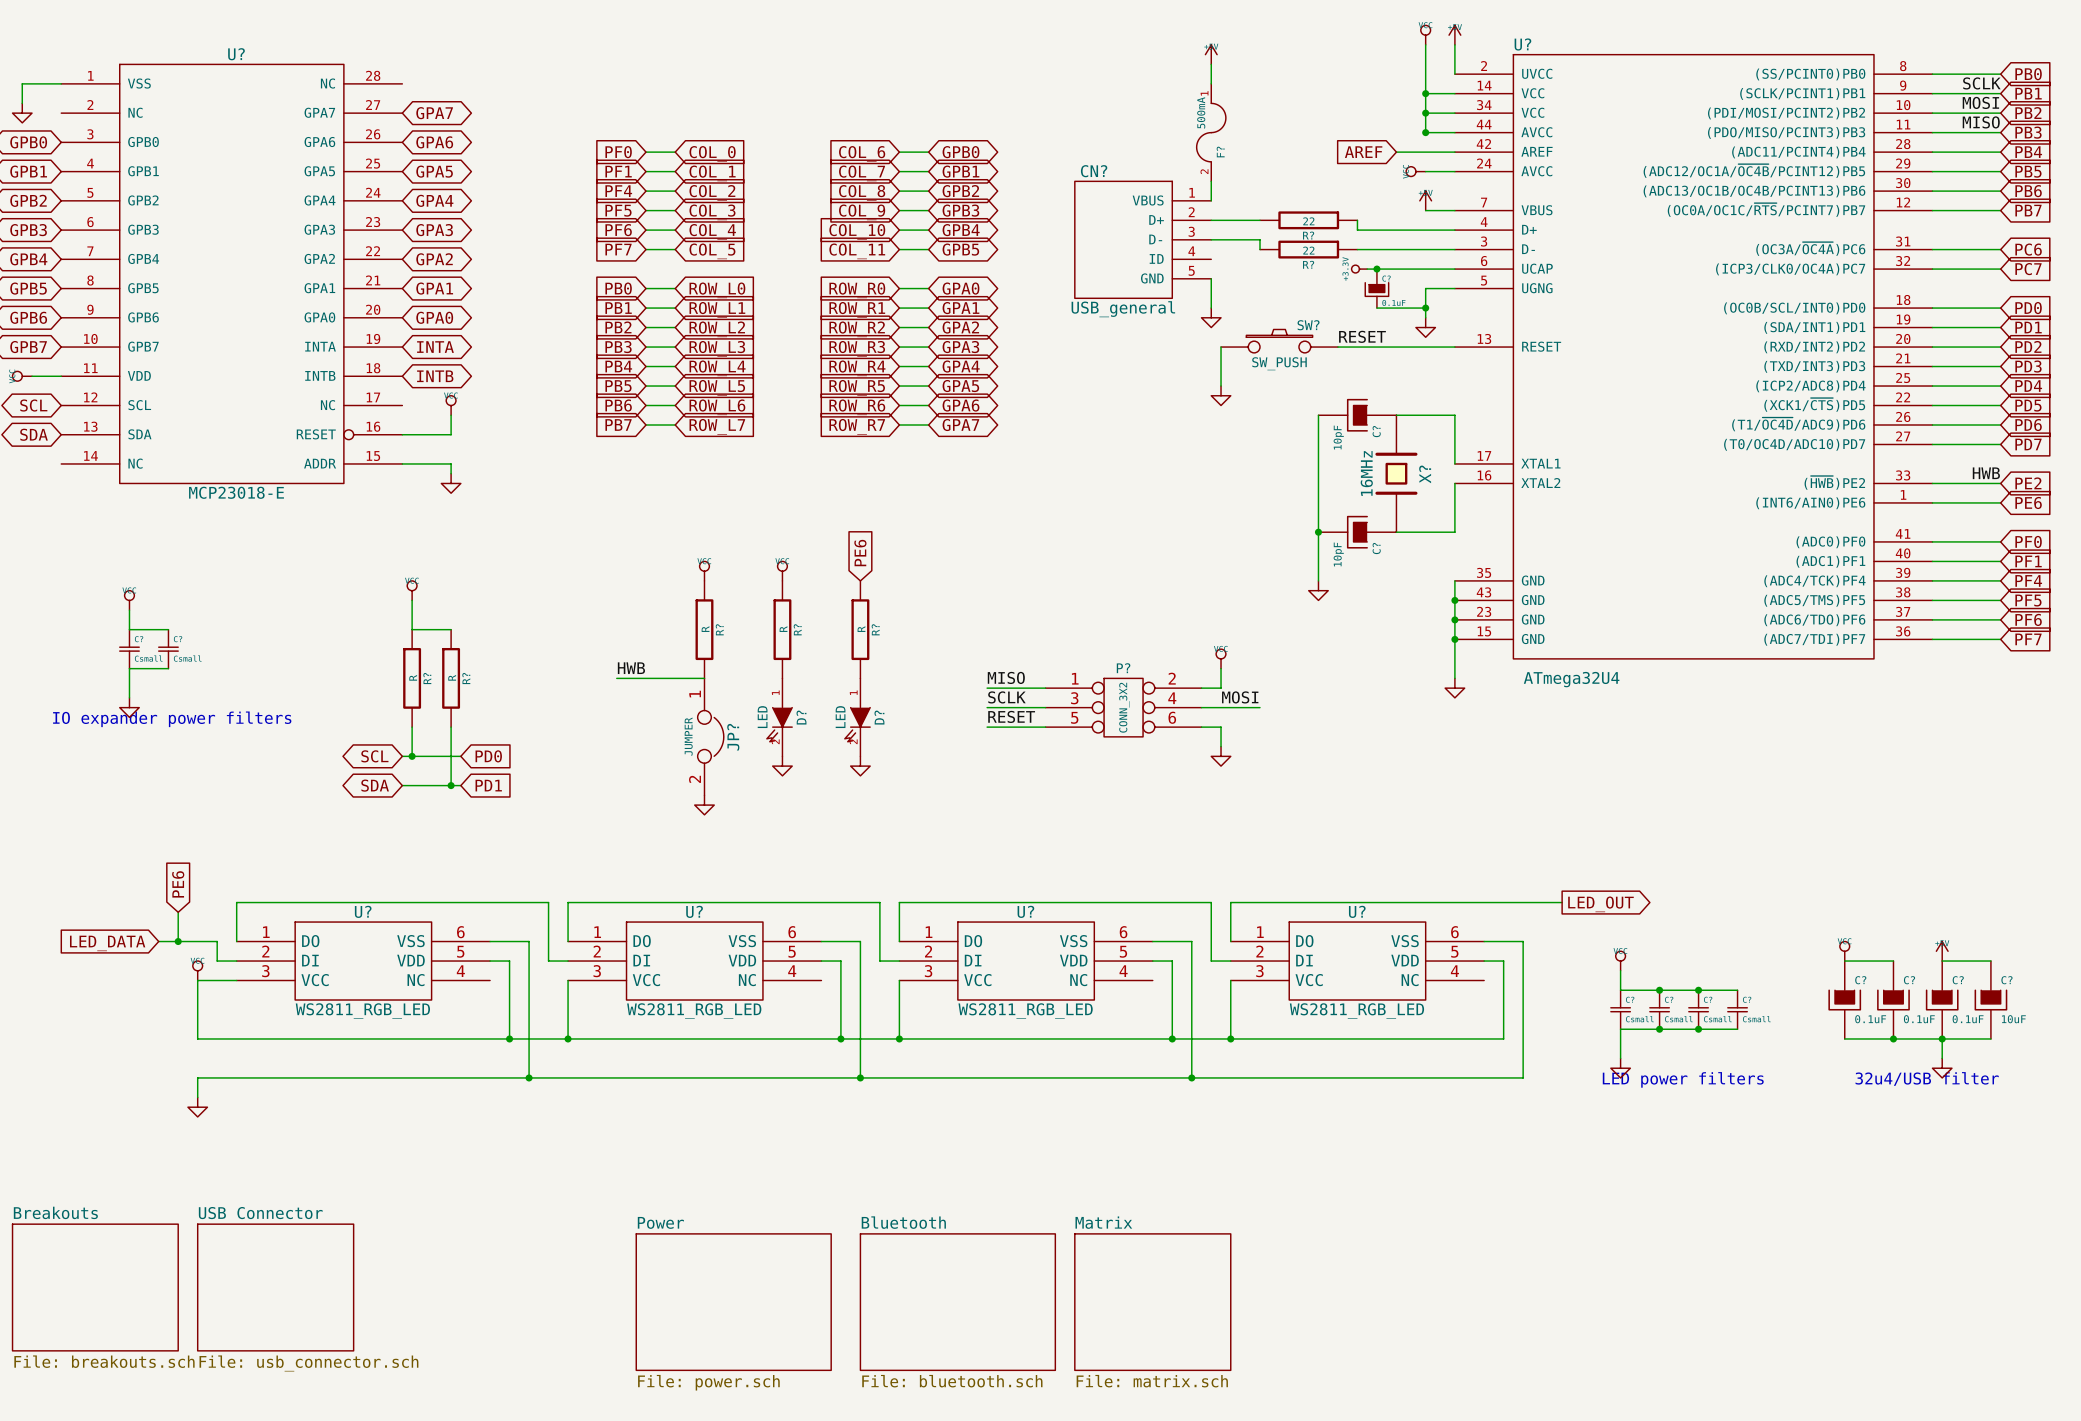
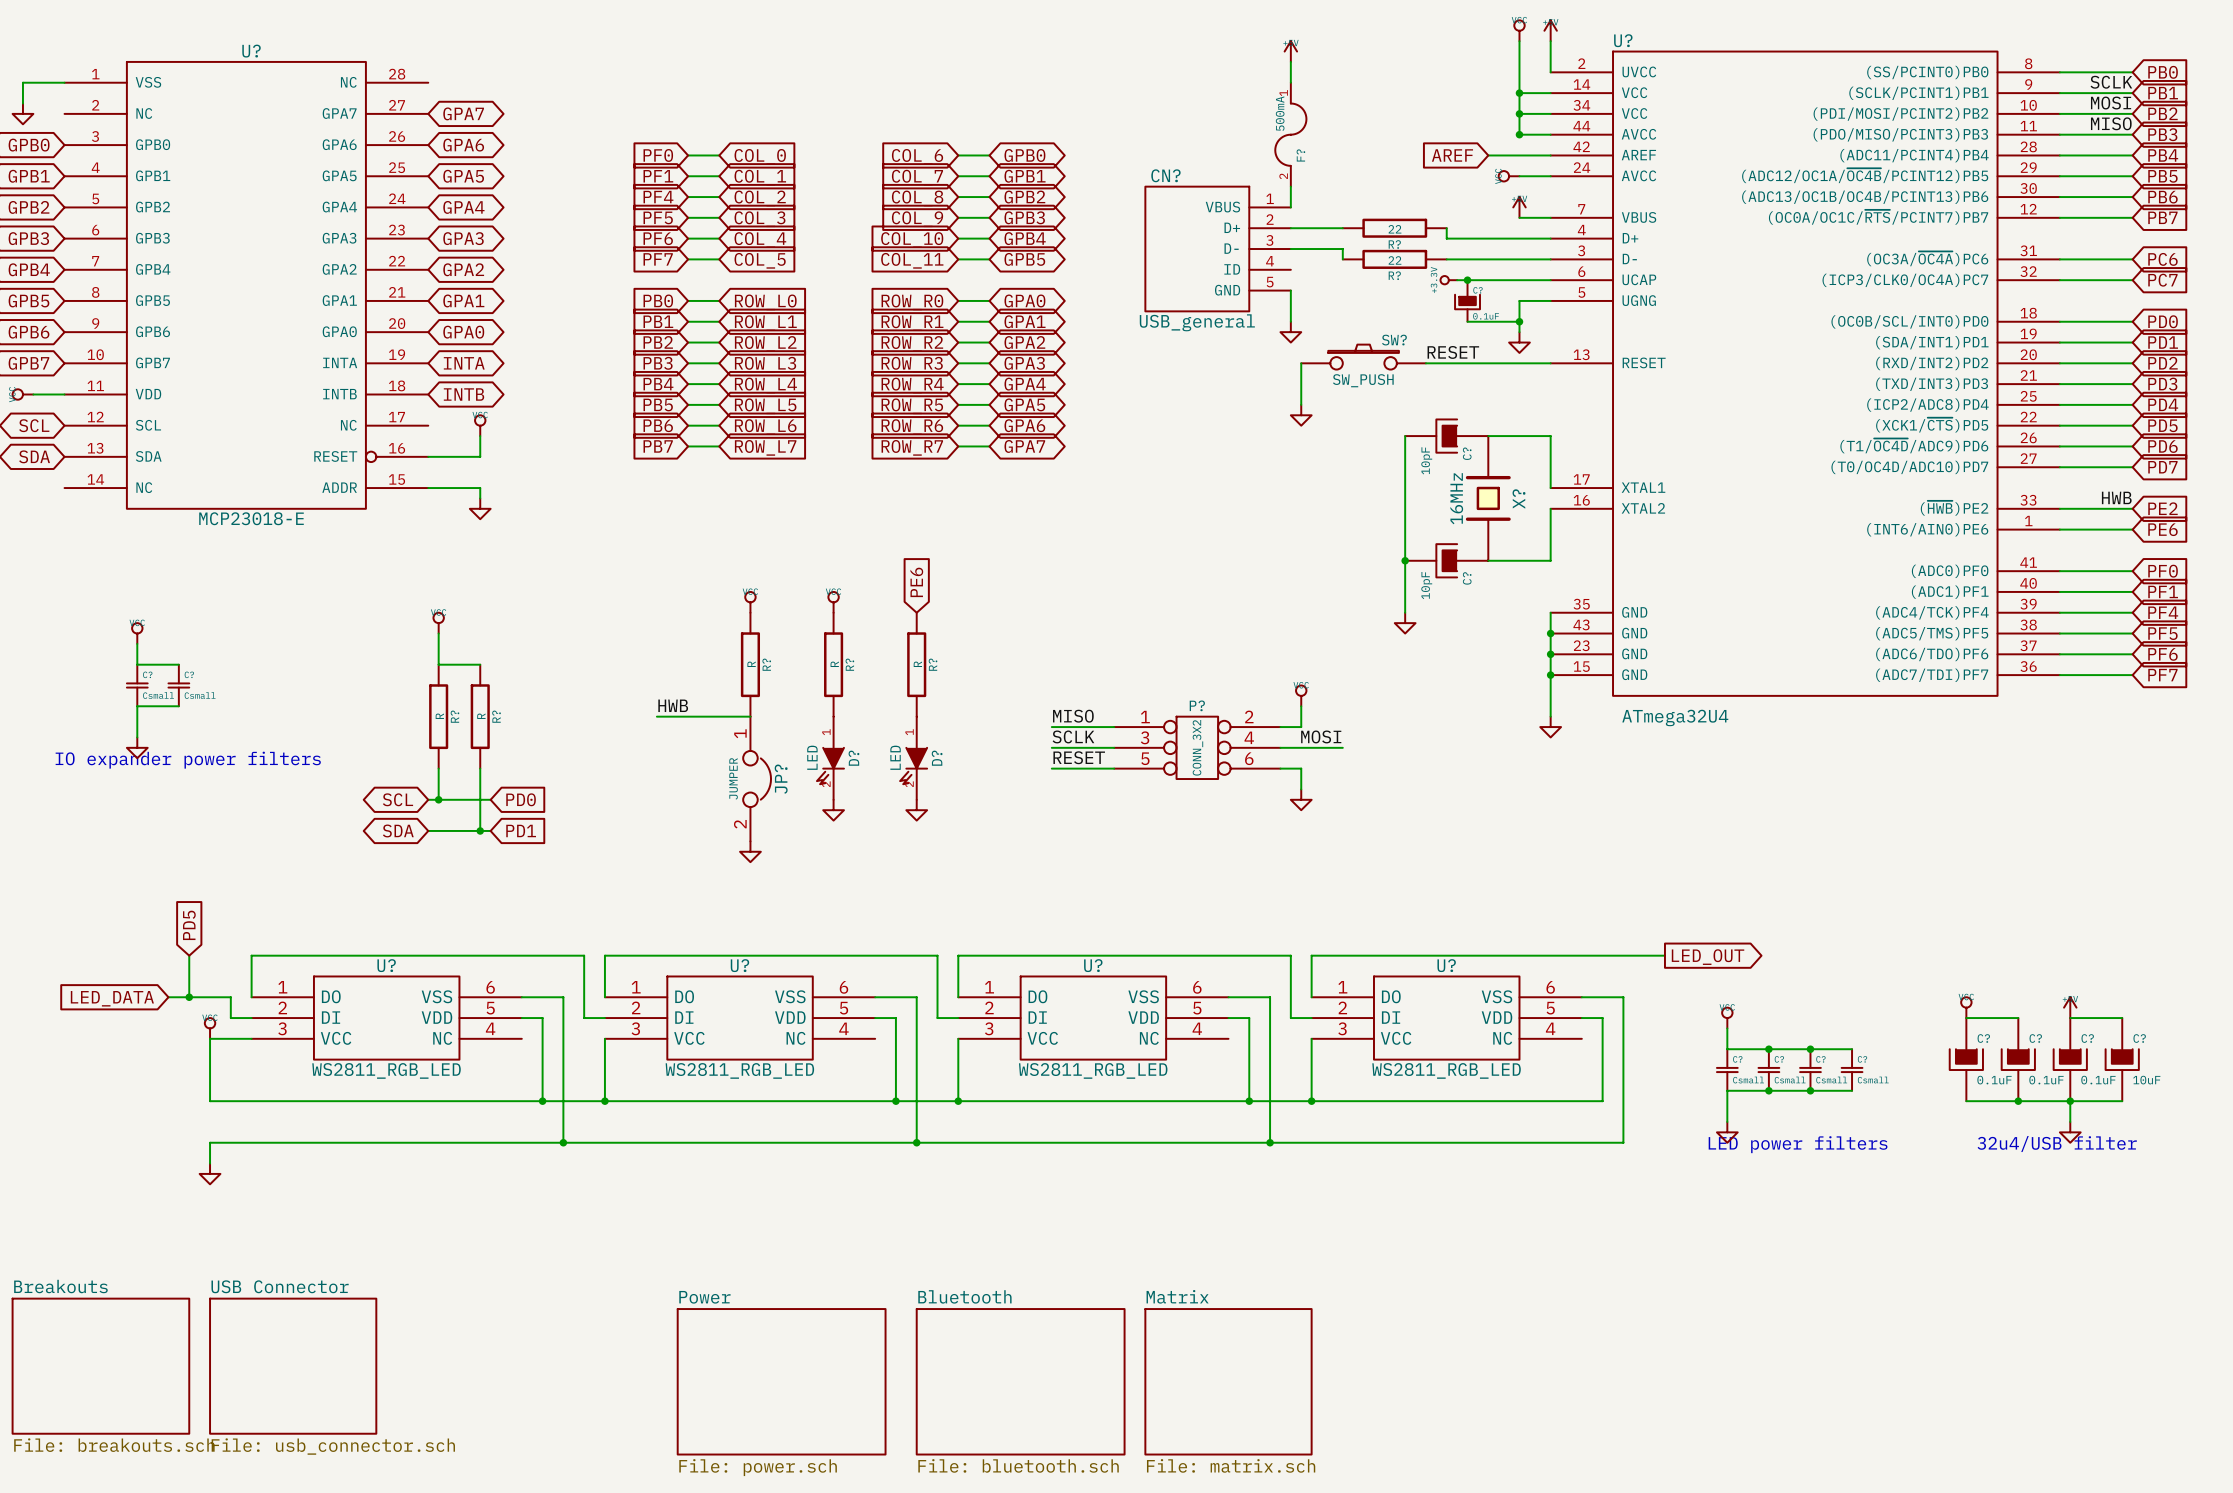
global label: none -> PD5 (189, 925)
global label: PE6 (178, 884) -> none
wire: none -> (189, 955) (189, 966)

